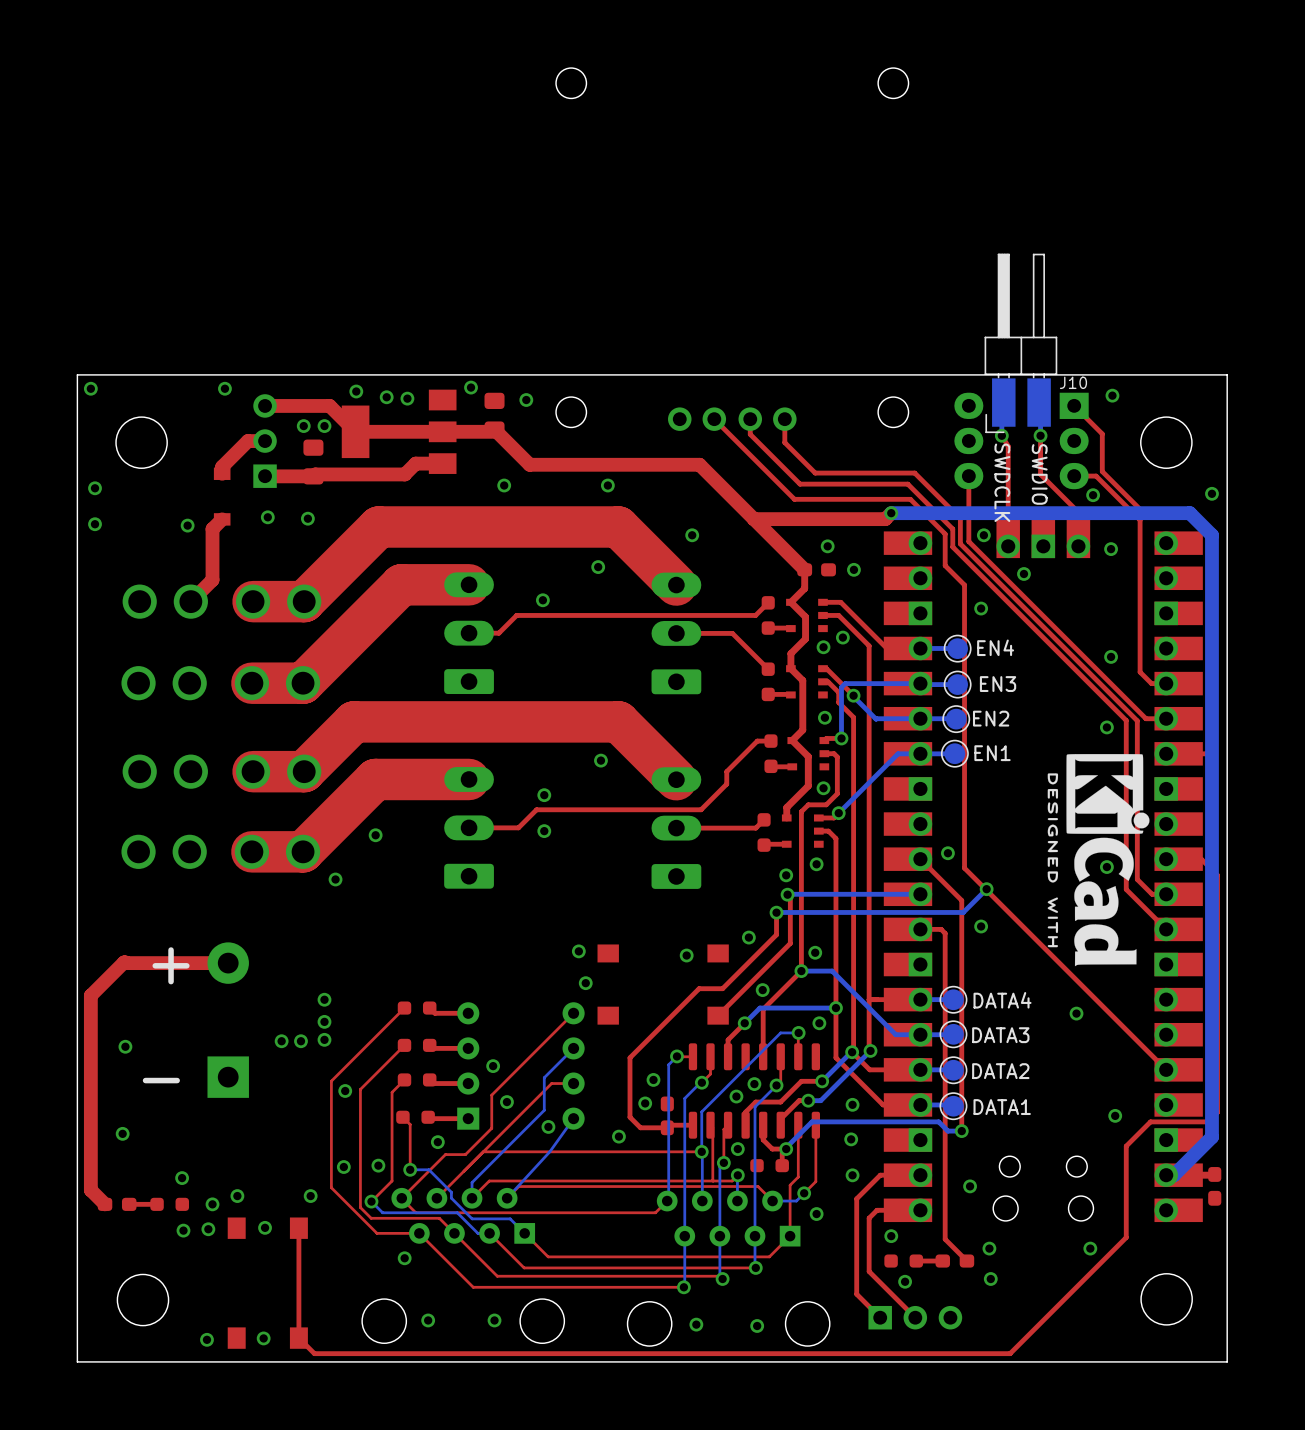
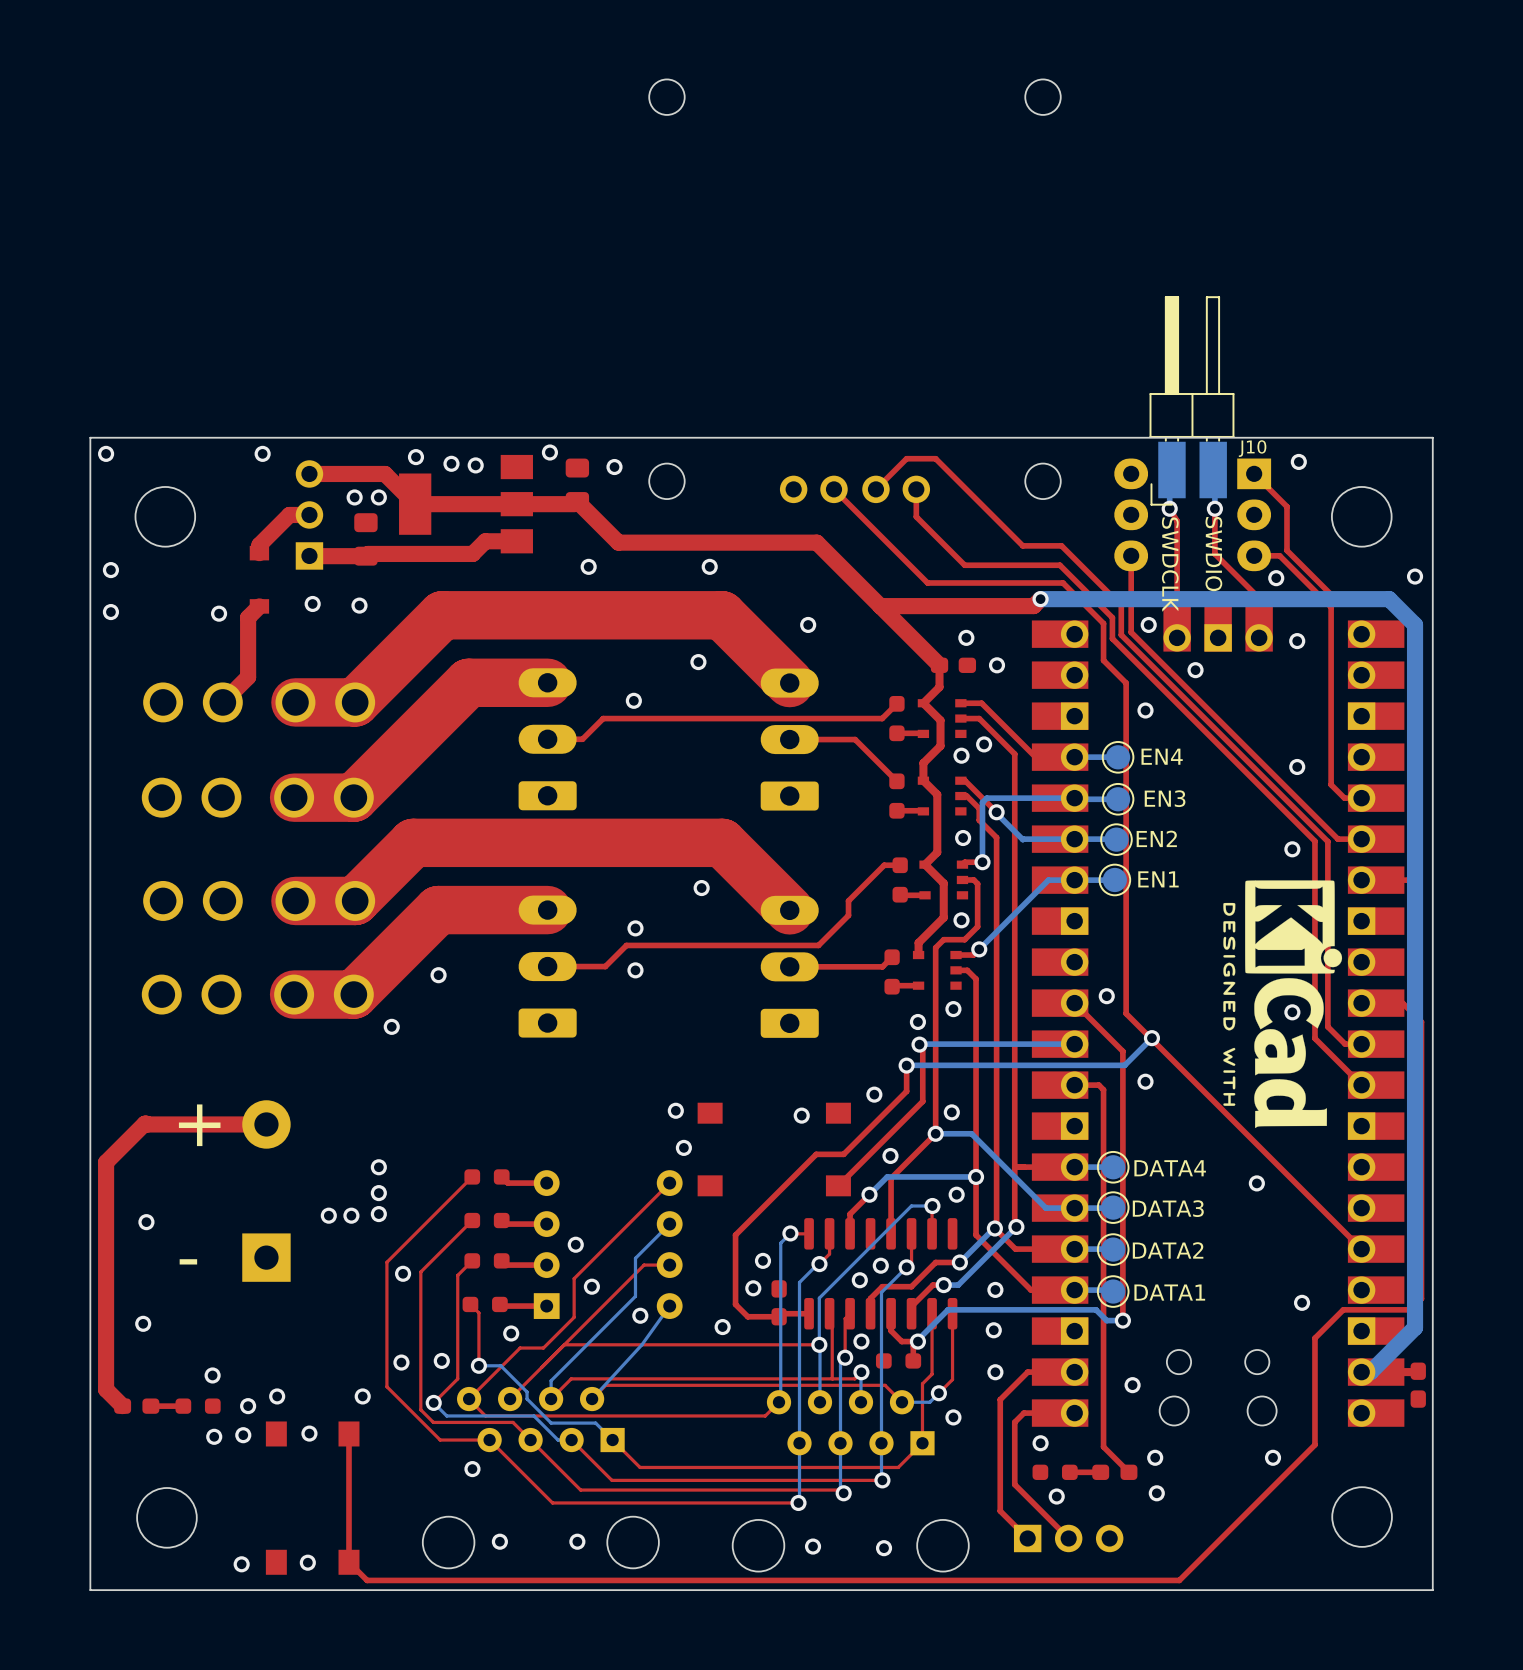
top track: (750, 419) (750, 434) (800, 484) (826, 484) -> (951, 552) (964, 565)
top track: (914, 473) (815, 473) -> (1068, 552) (1061, 545) (1022, 545) (935, 458) (906, 458) (875, 489)

